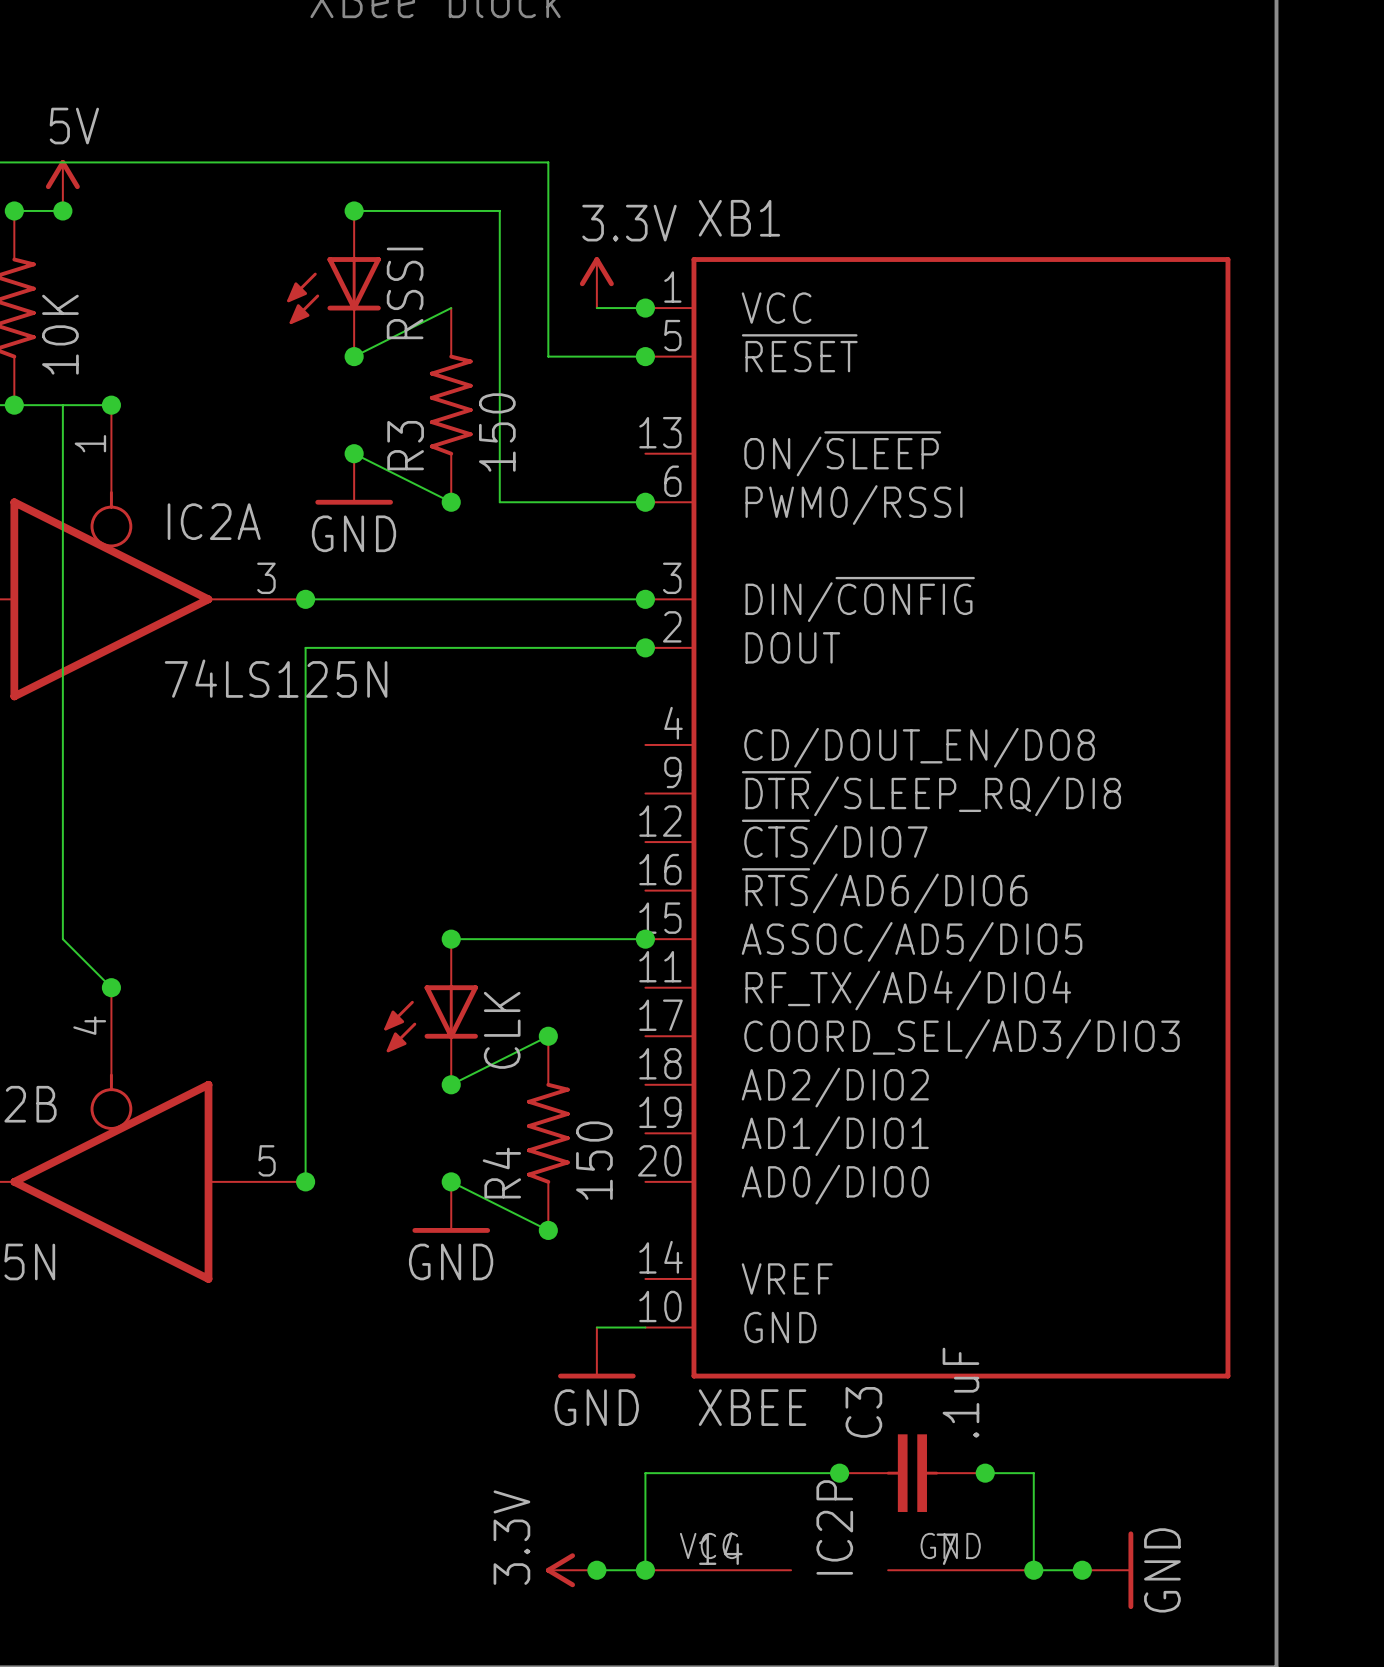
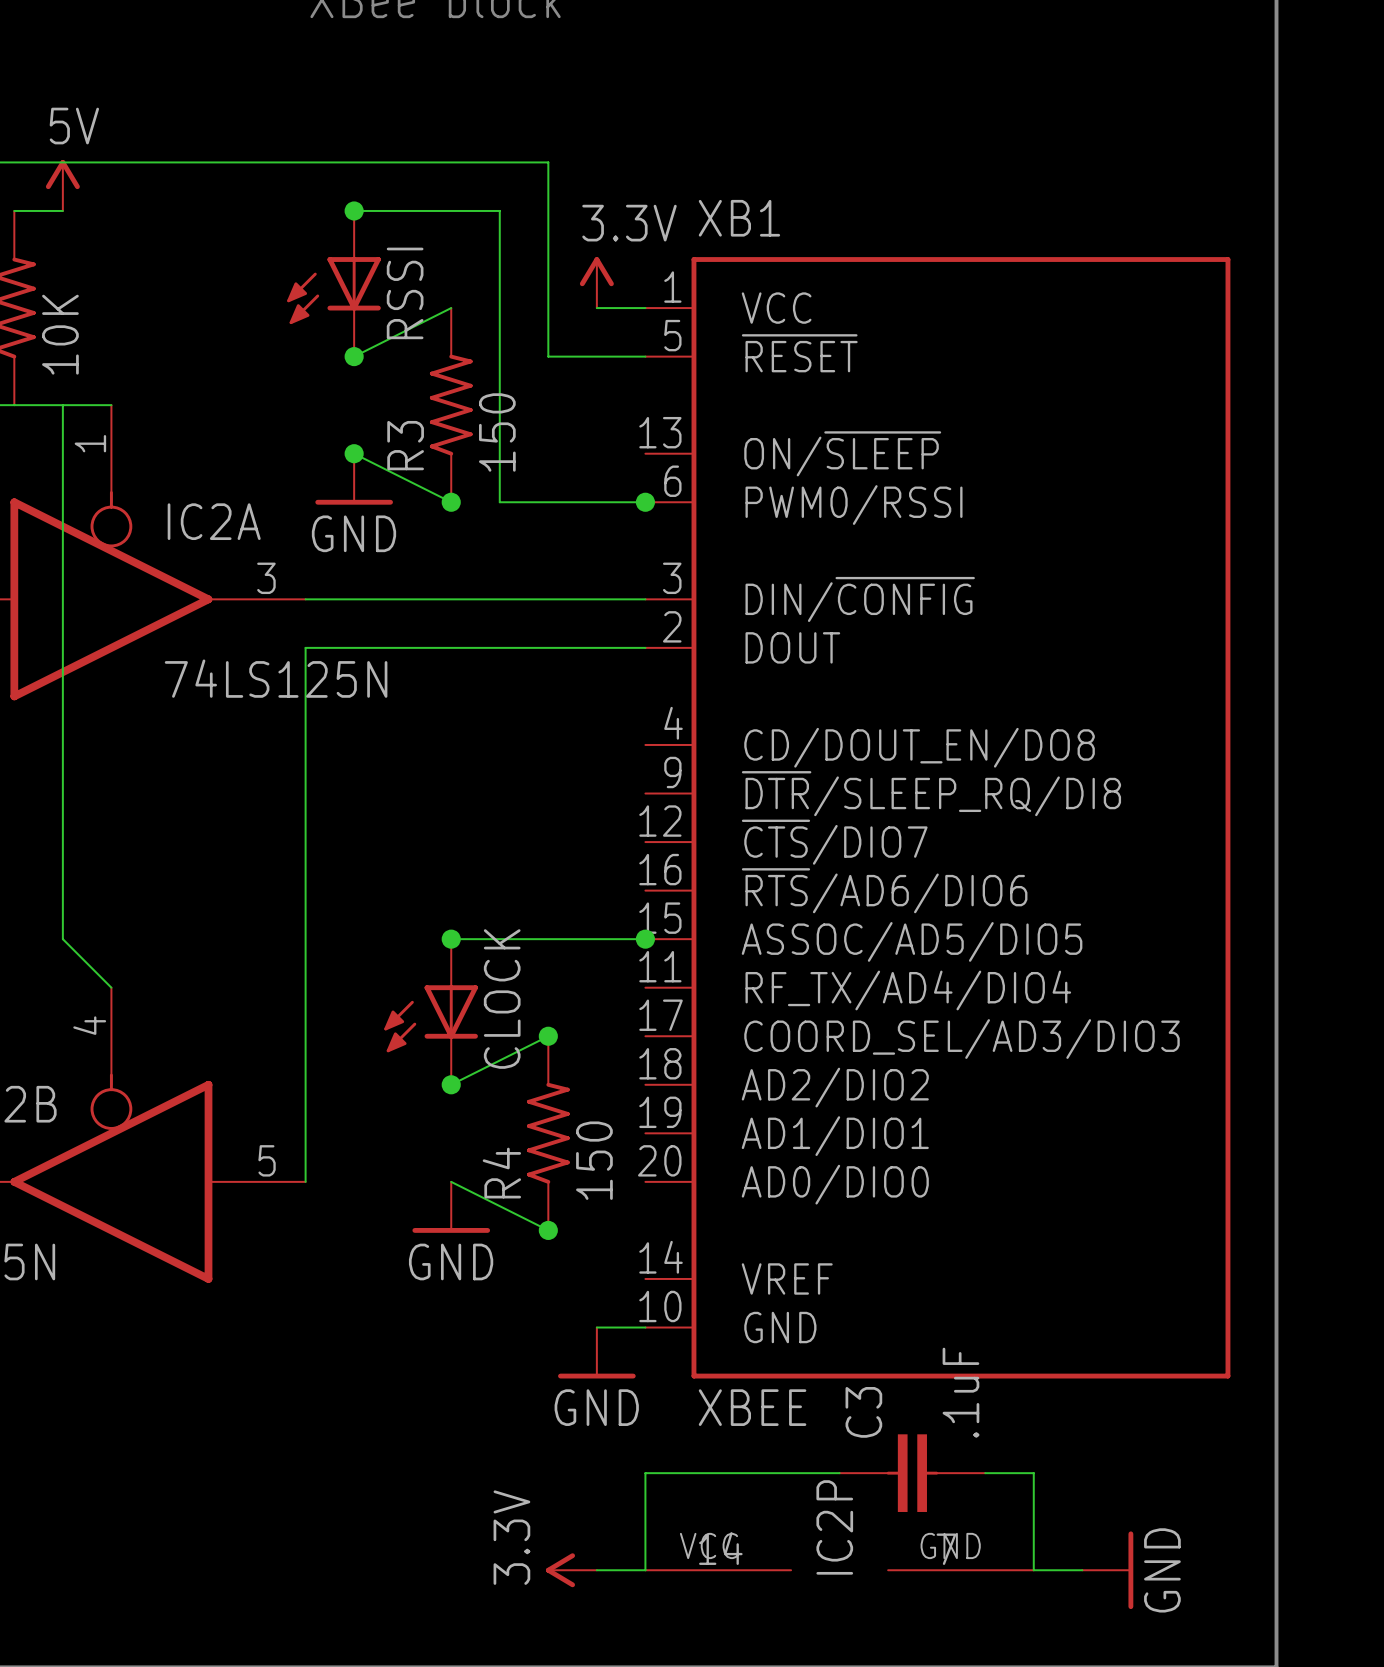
junction: (14, 210) -> none
junction: (62, 210) -> none
junction: (645, 308) -> none
junction: (645, 356) -> none
junction: (14, 405) -> none
junction: (111, 405) -> none
junction: (305, 599) -> none
junction: (645, 599) -> none
junction: (645, 647) -> none
junction: (111, 987) -> none
CLK name: CLK (502, 1030) -> CLOCK (502, 999)
junction: (305, 1181) -> none
junction: (451, 1181) -> none
junction: (839, 1473) -> none
junction: (985, 1473) -> none
junction: (596, 1570) -> none
junction: (645, 1570) -> none
junction: (1033, 1570) -> none
junction: (1082, 1570) -> none

